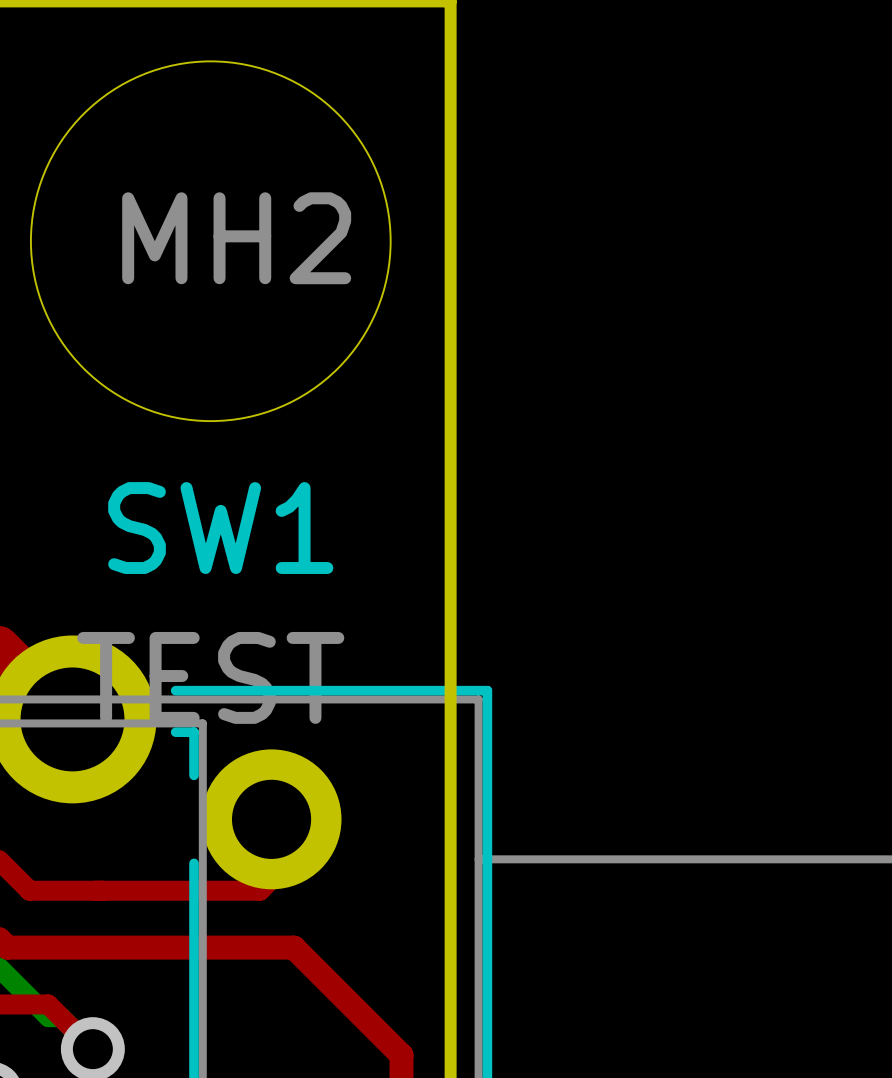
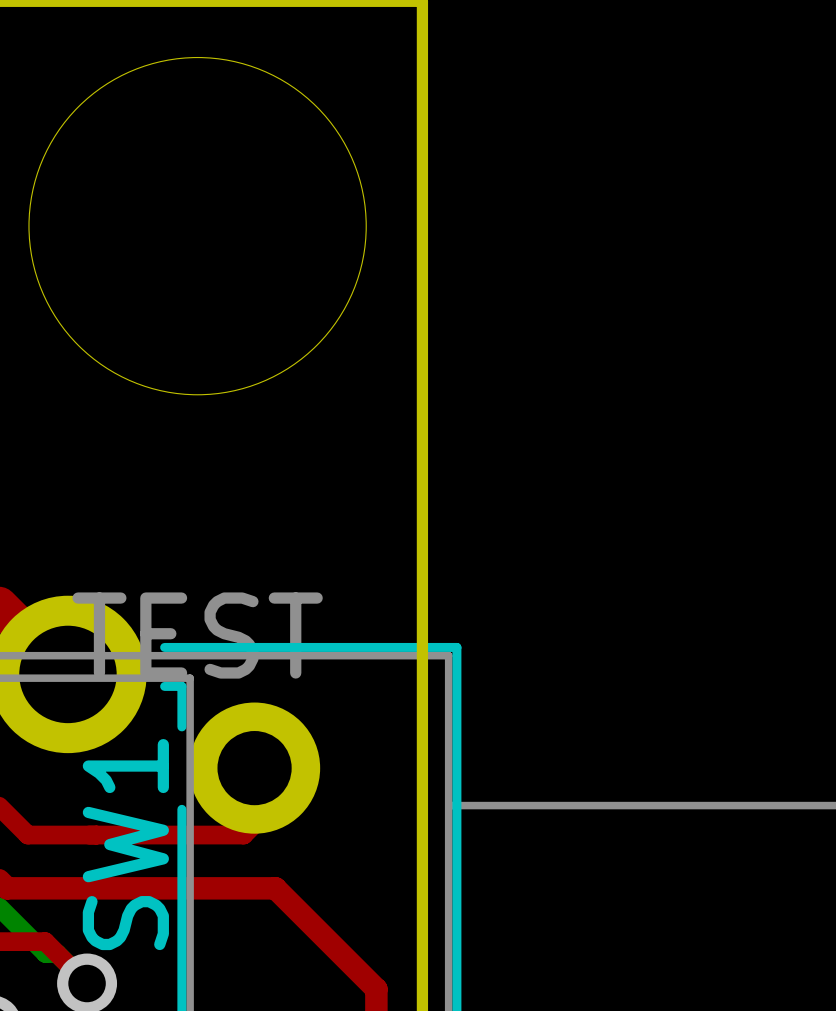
MH2 name: MH2 (236, 238) -> none
SW1 name rotation: 0° (220, 528) -> 90° counterclockwise (125, 844)
SW1 name position: SW1 (220, 528) -> SW1 (125, 844)

